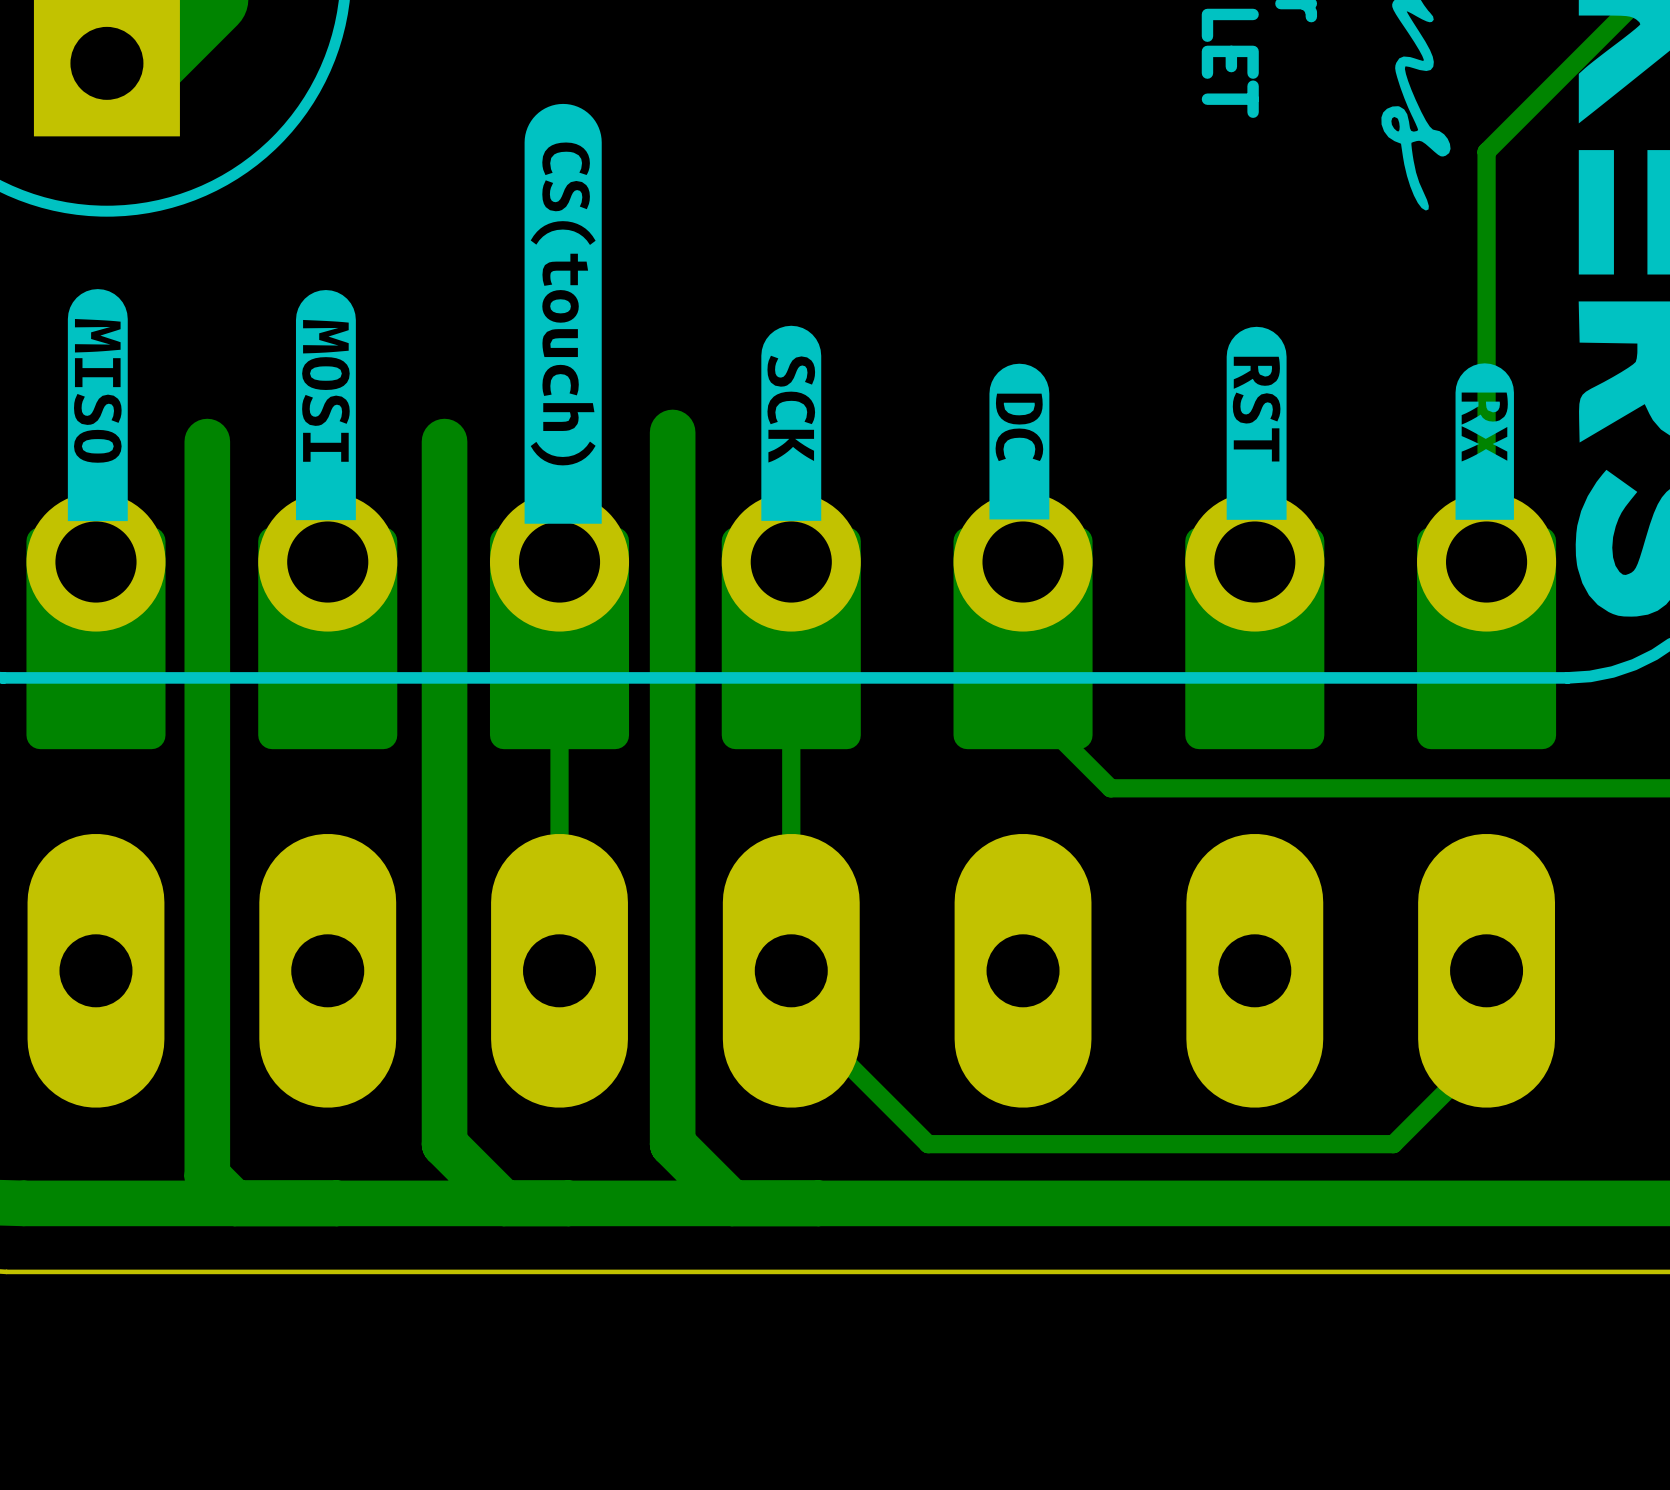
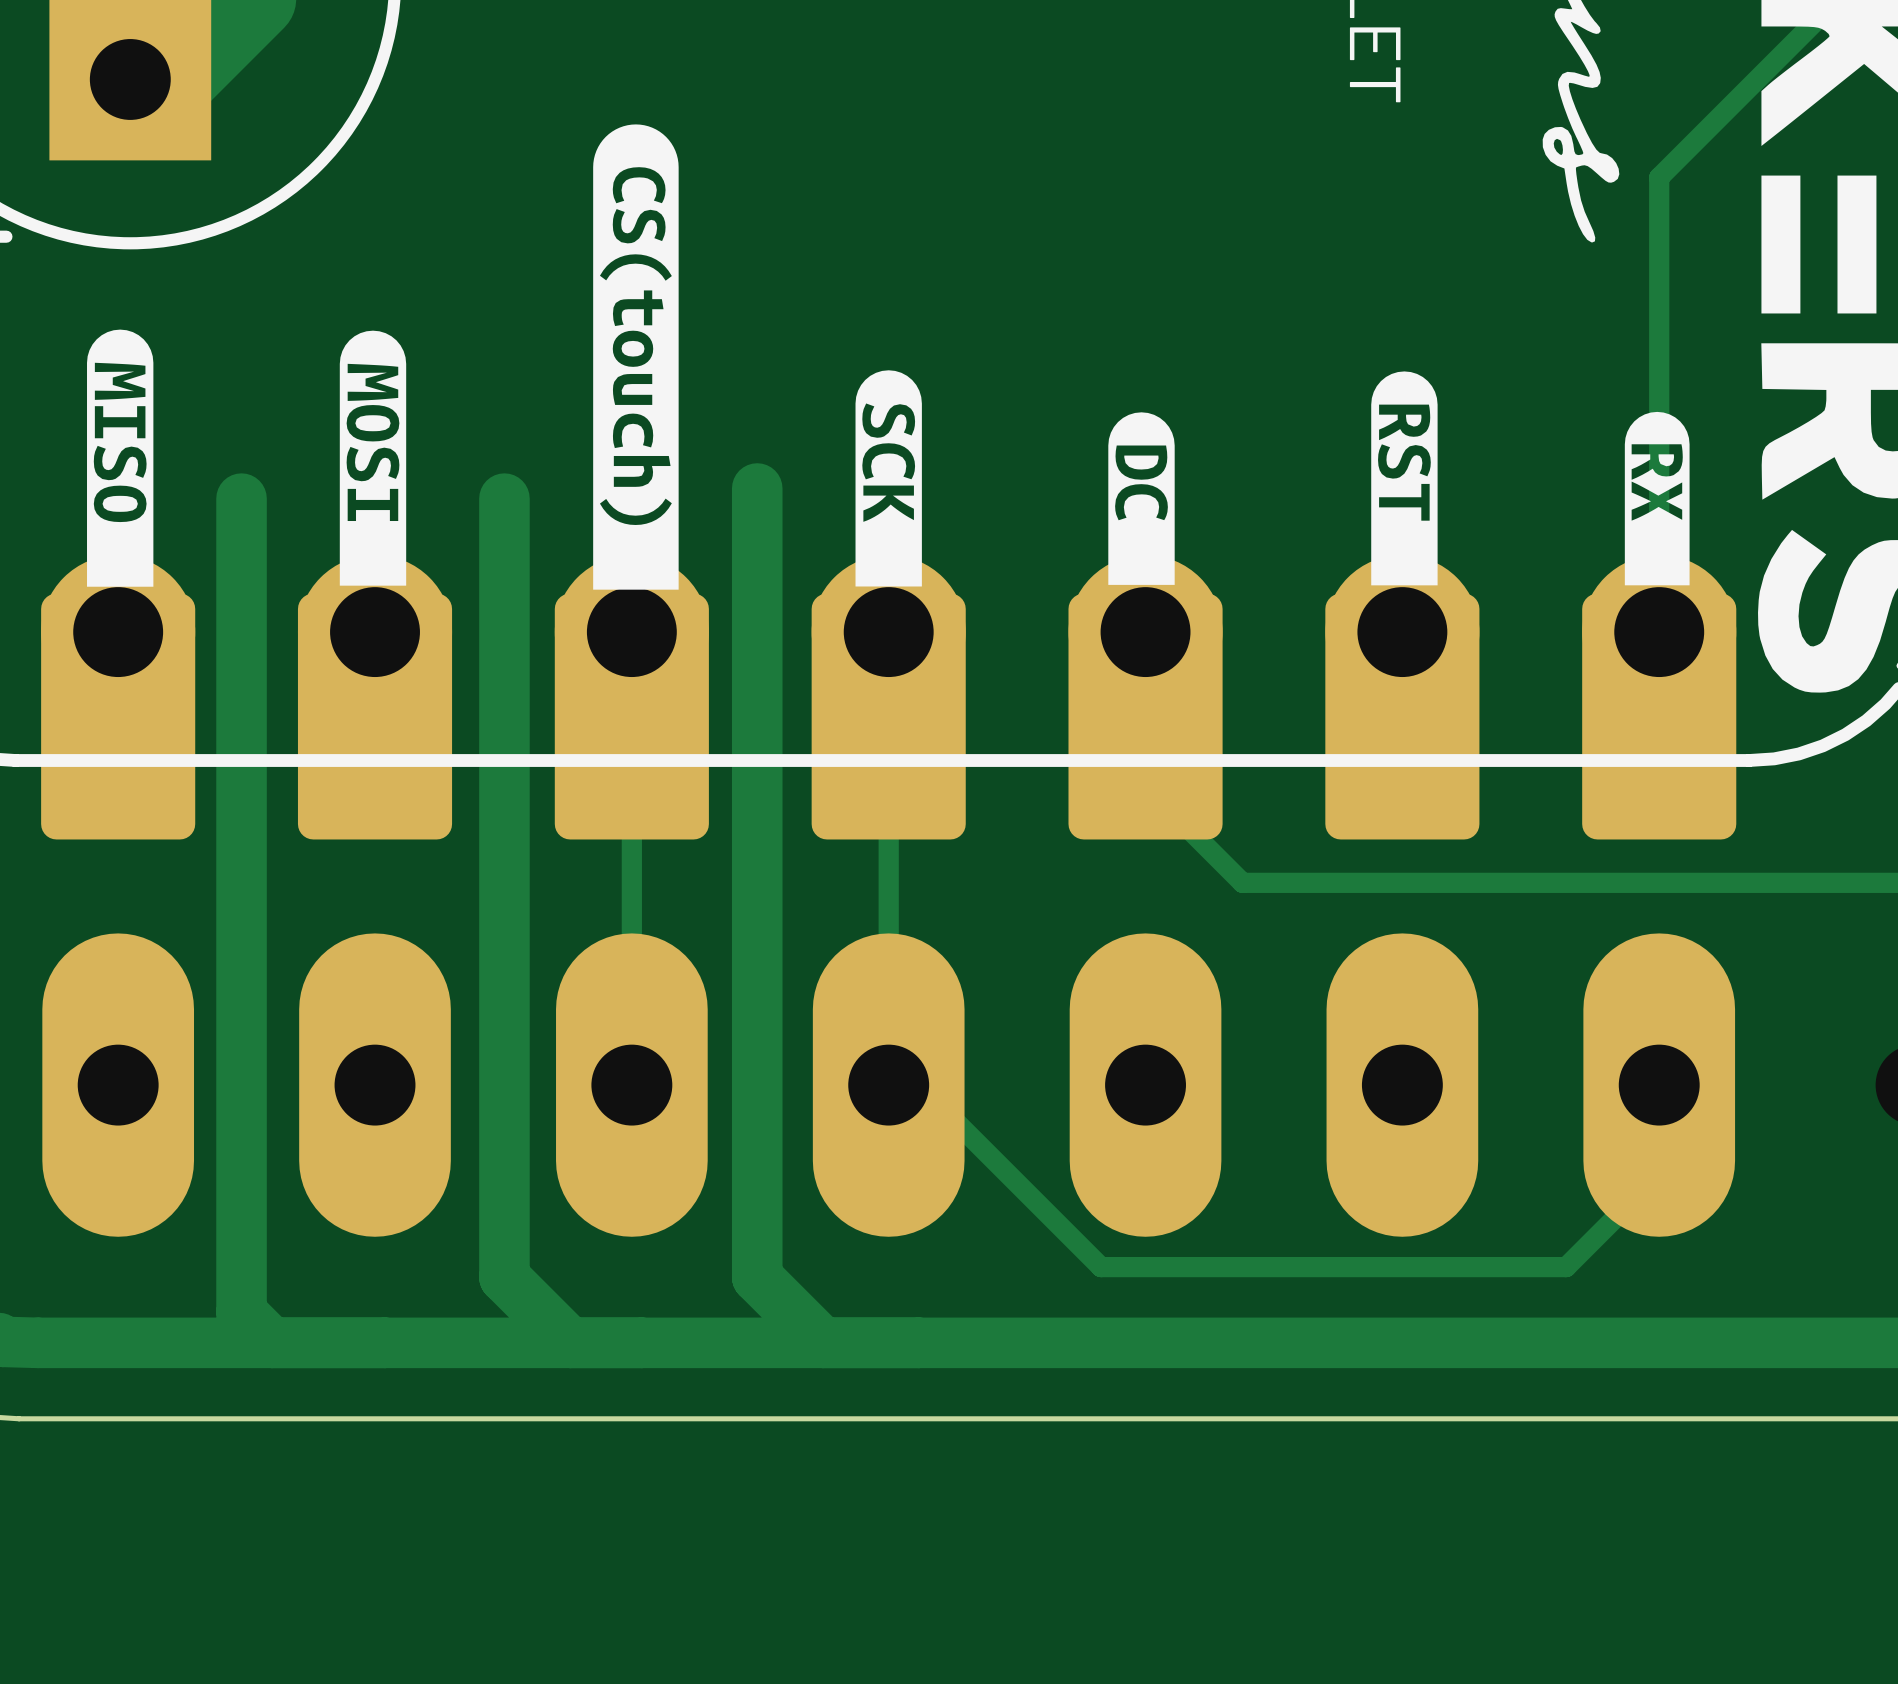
track: (791, 970) (791, 1007) (928, 1144) (1393, 1144) (1402, 1135) -> (888, 1085) (919, 1085) (1101, 1267) (1566, 1267)

